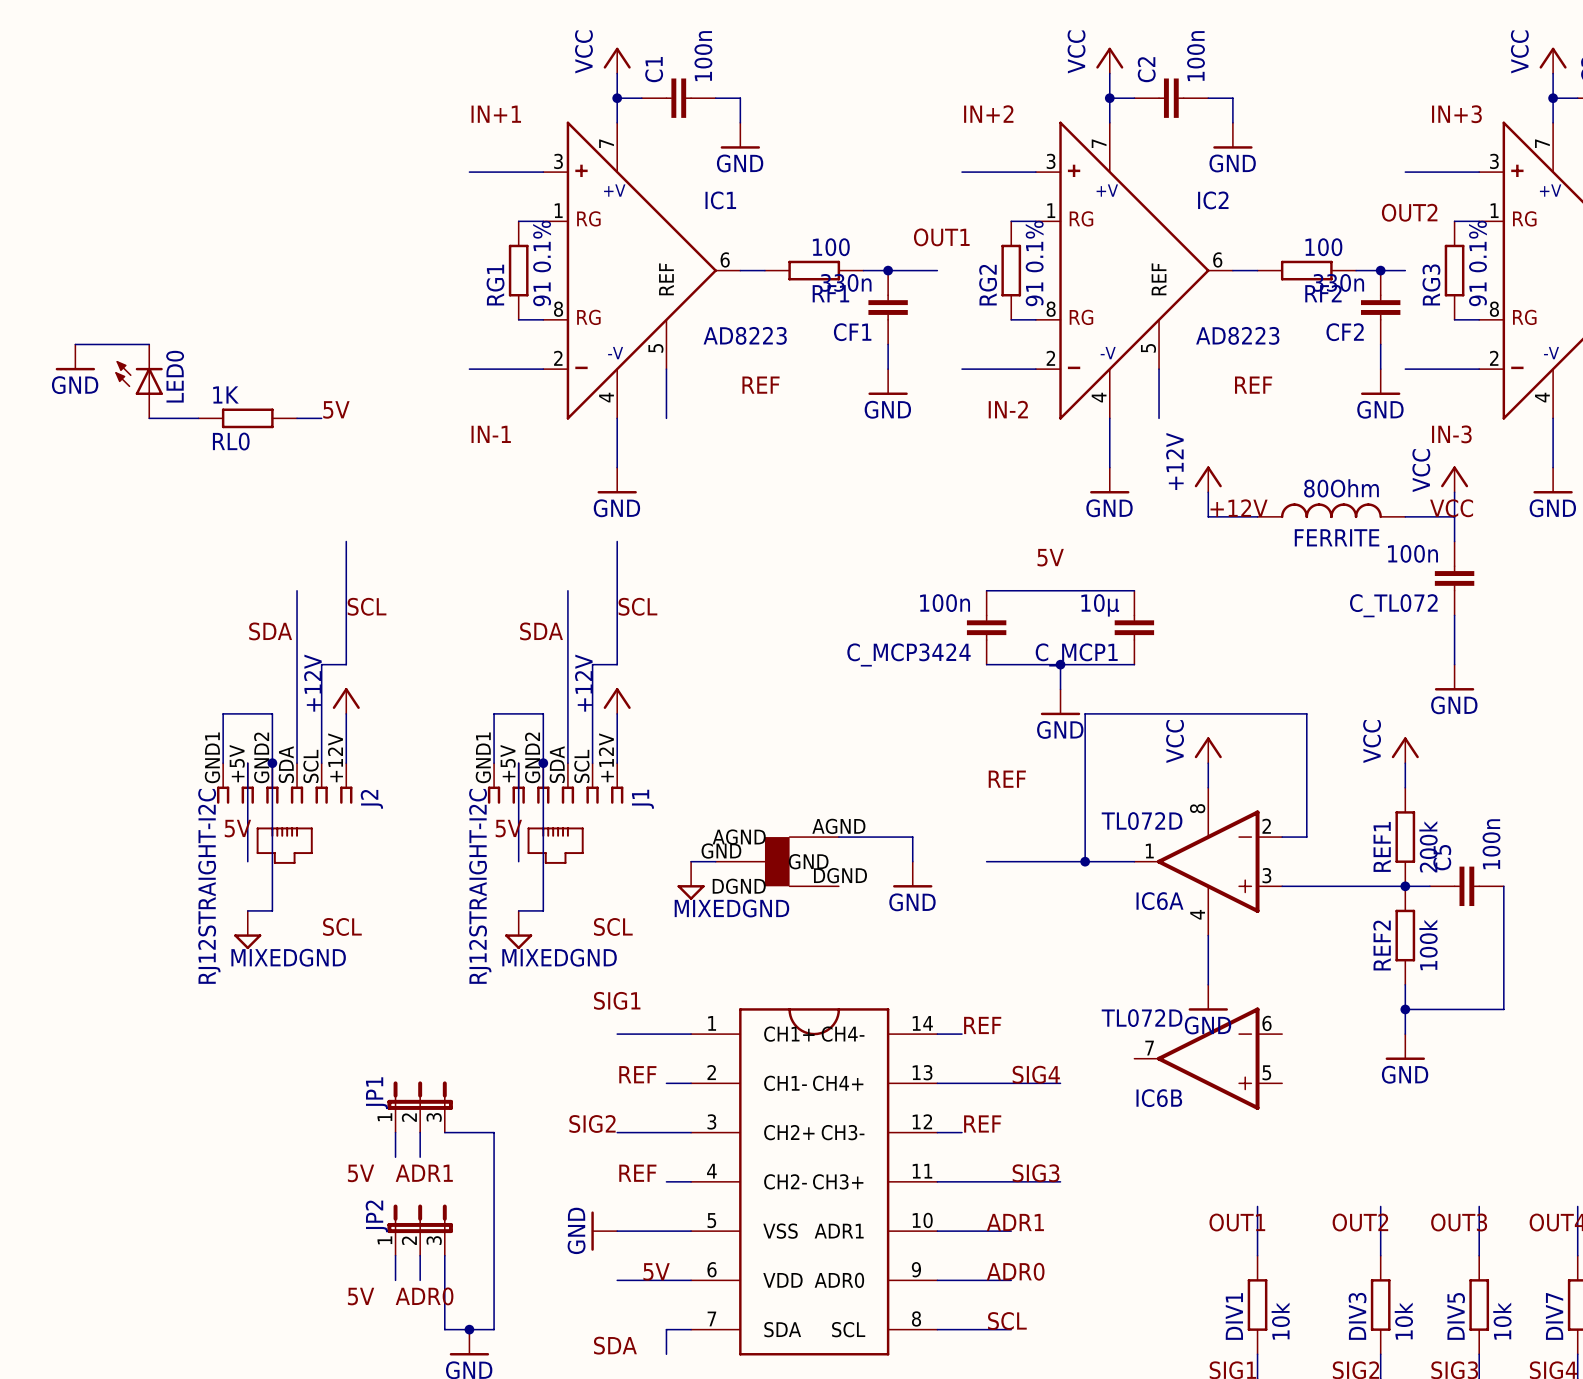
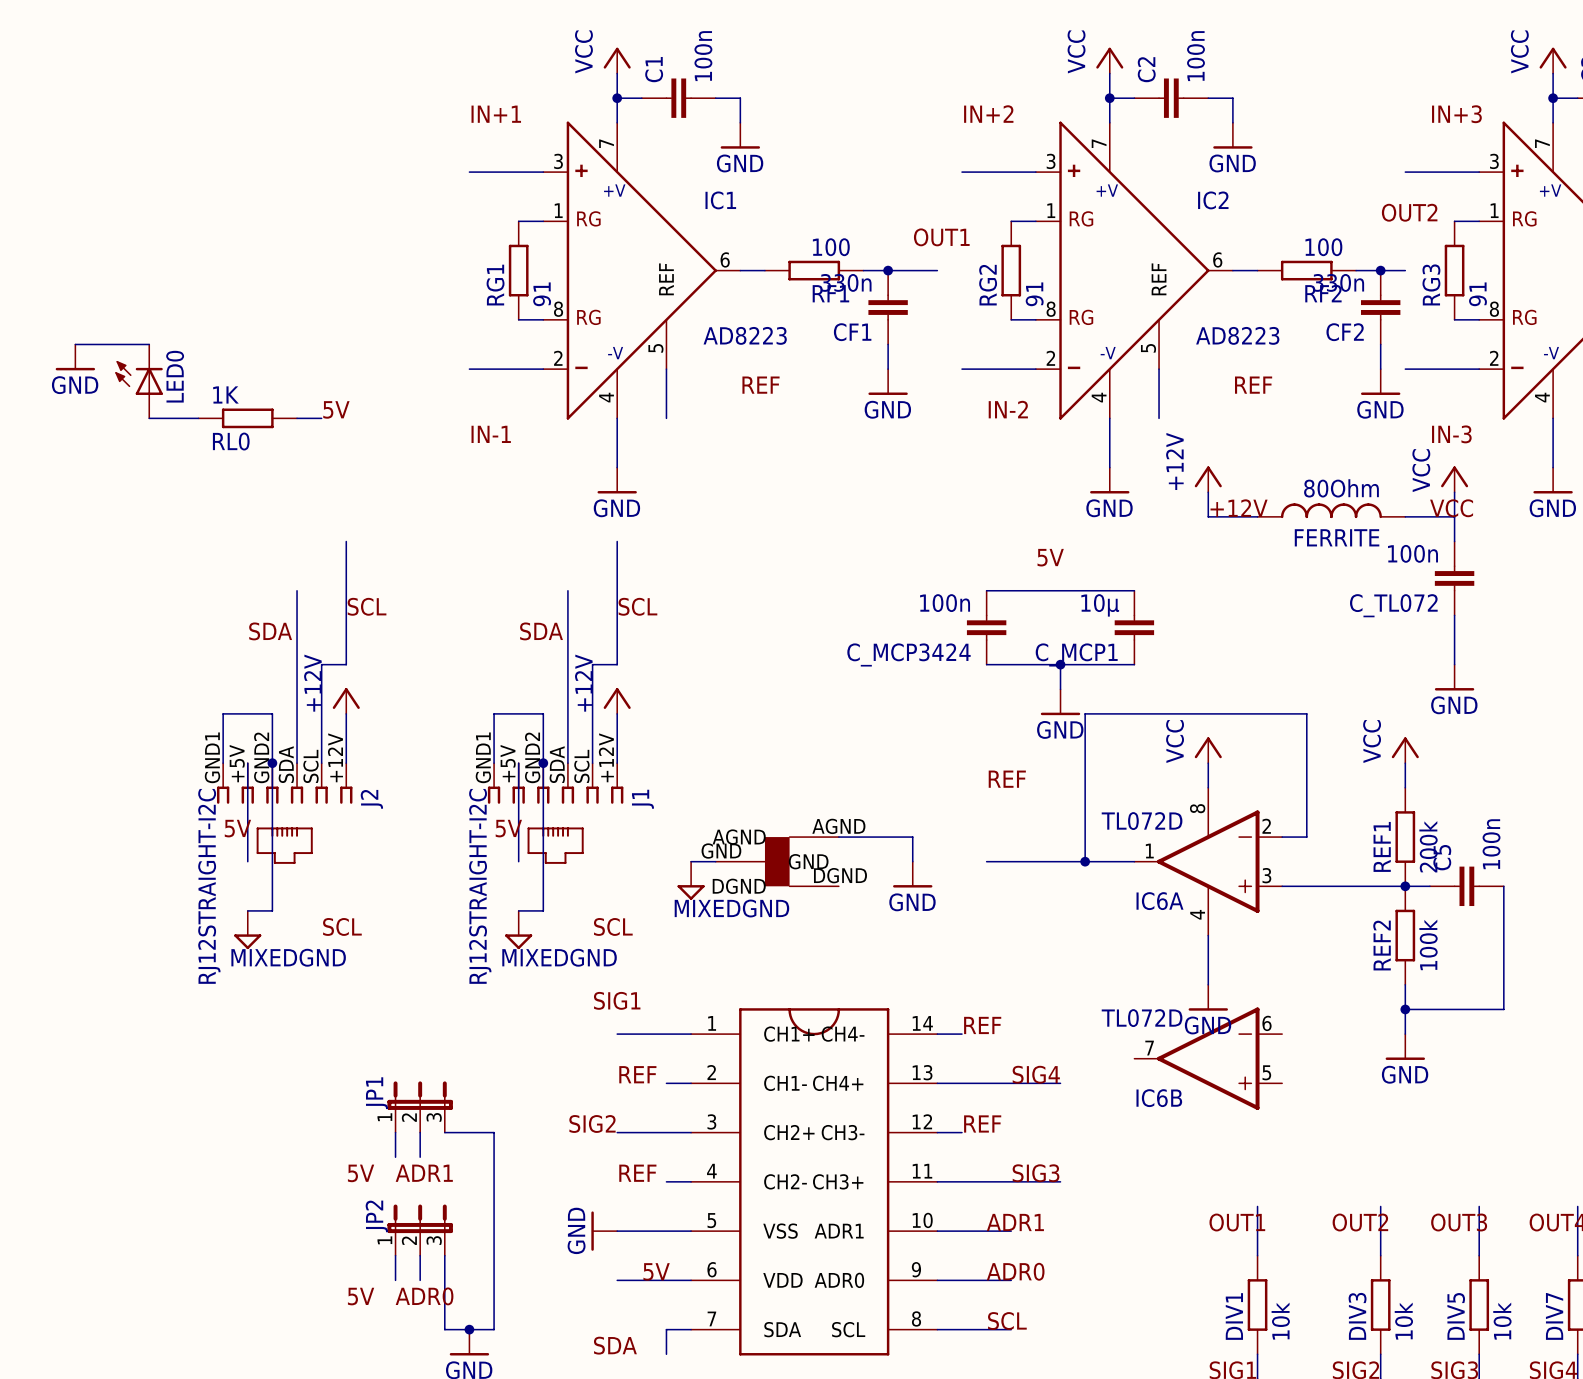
RG1 value: 91 0.1% (542, 263) -> 91 (542, 294)
RG2 value: 91 0.1% (1034, 263) -> 91 (1034, 294)
RG3 value: 91 0.1% (1477, 263) -> 91 (1477, 294)

